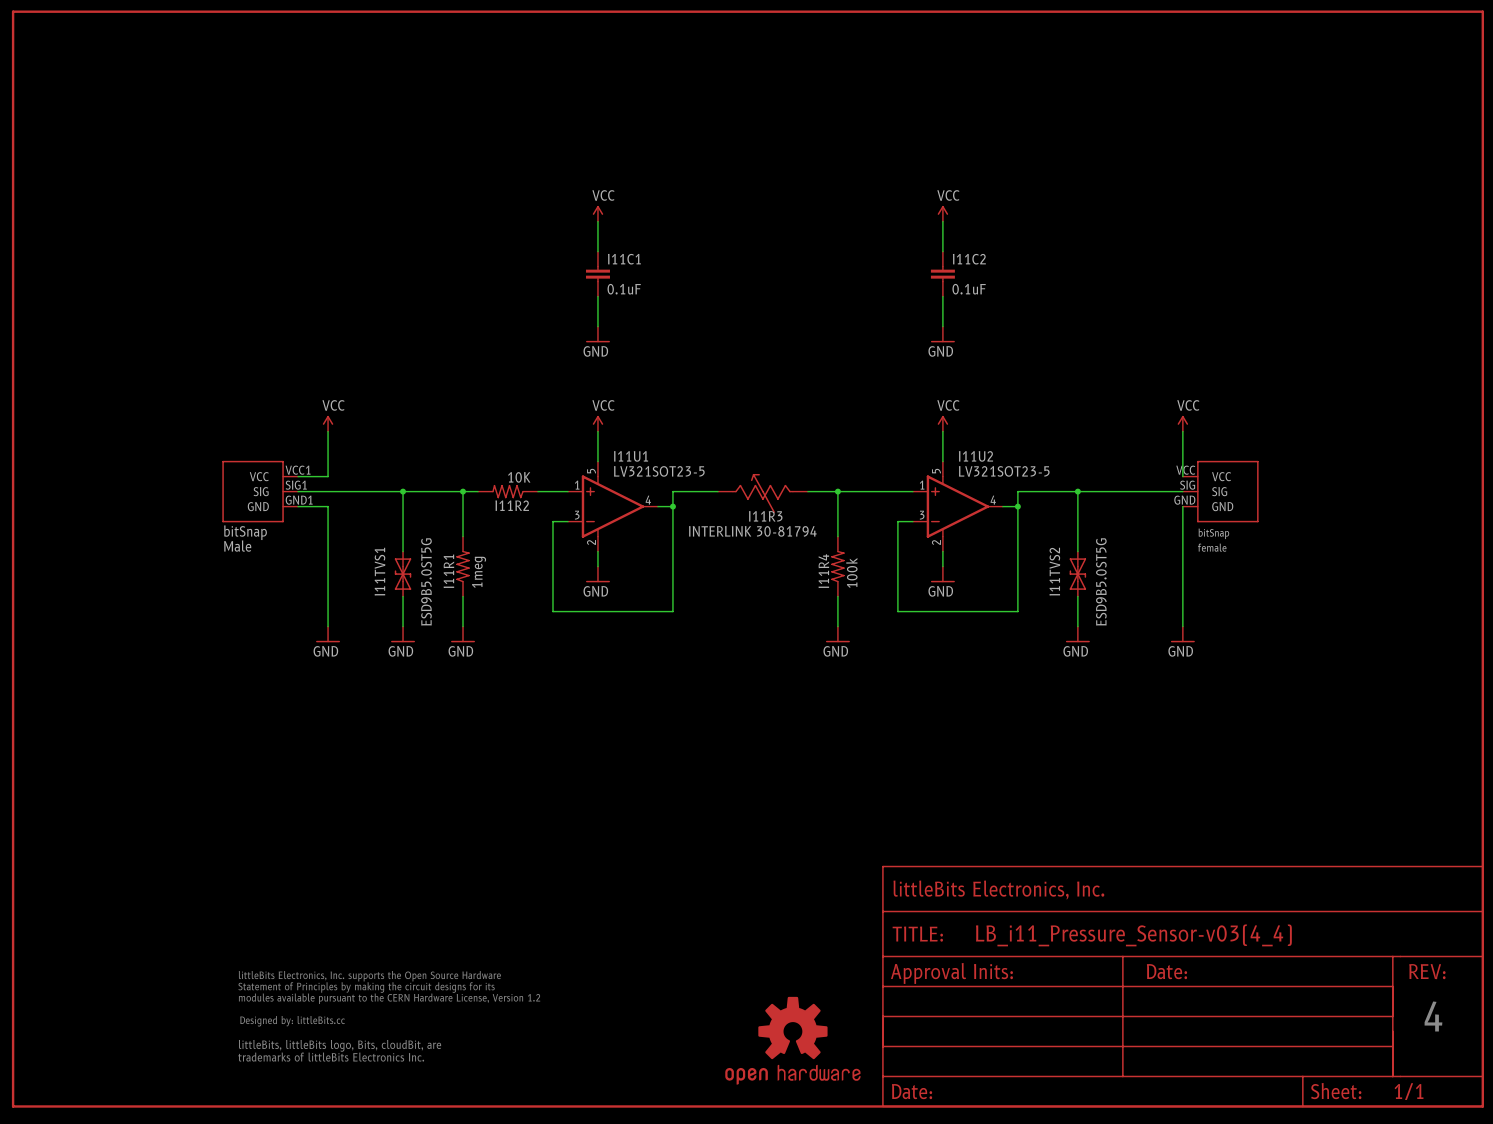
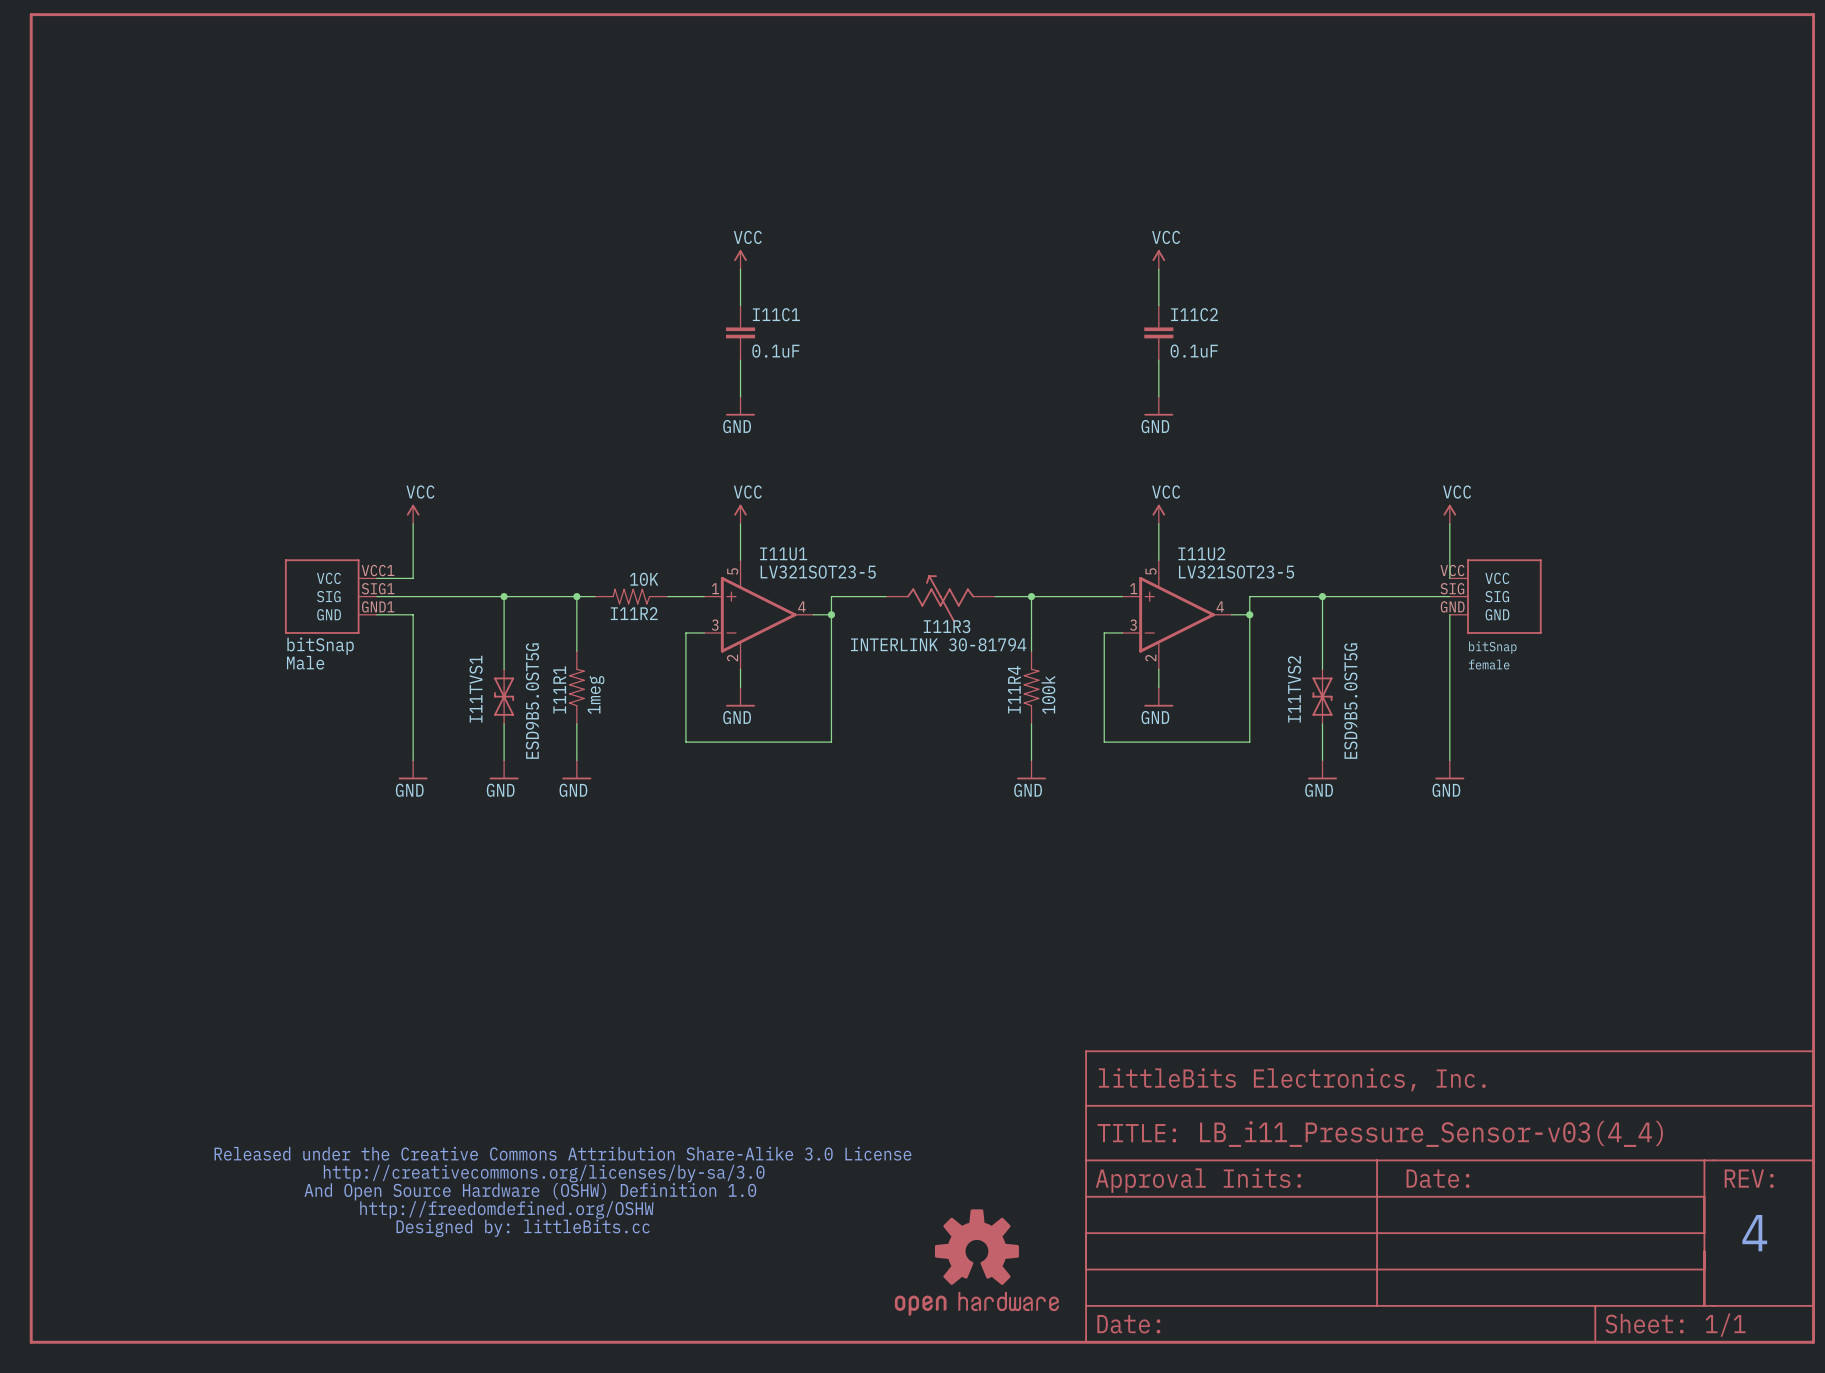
part: none -> (562, 1191)
part: (389, 1016) -> none

